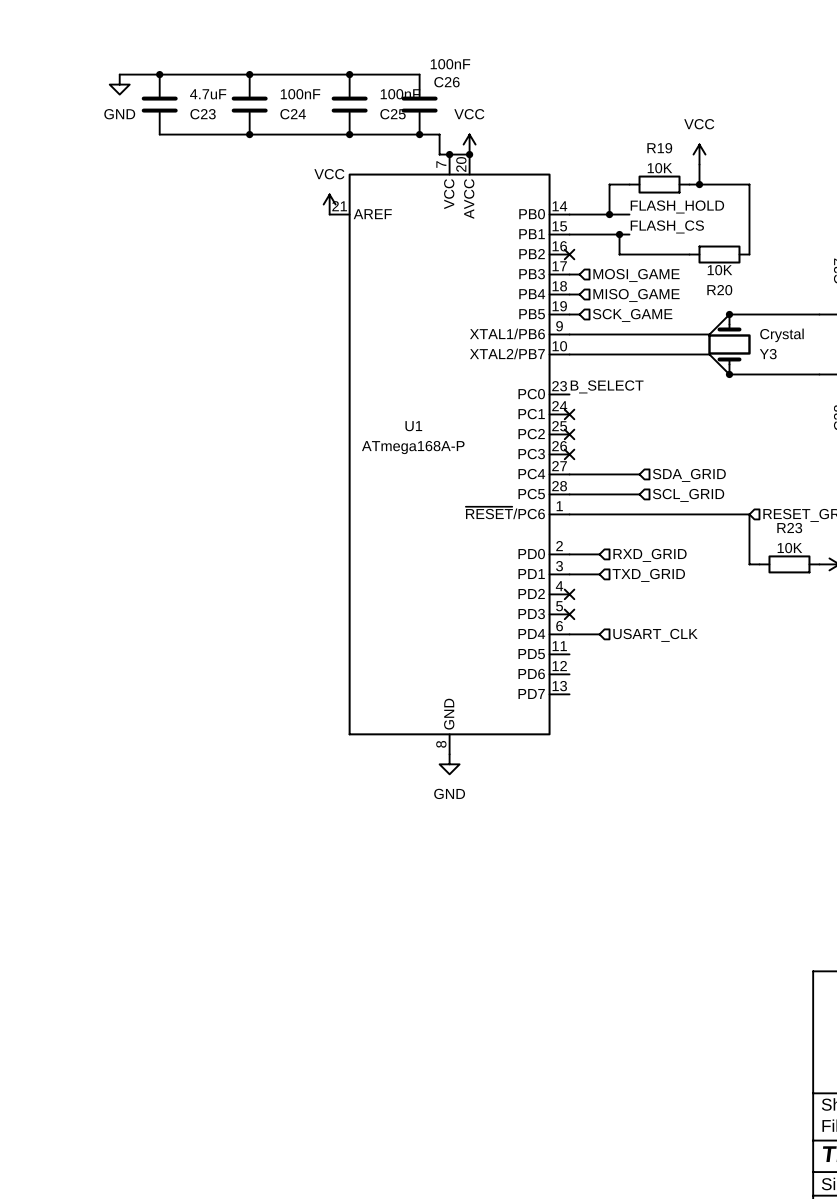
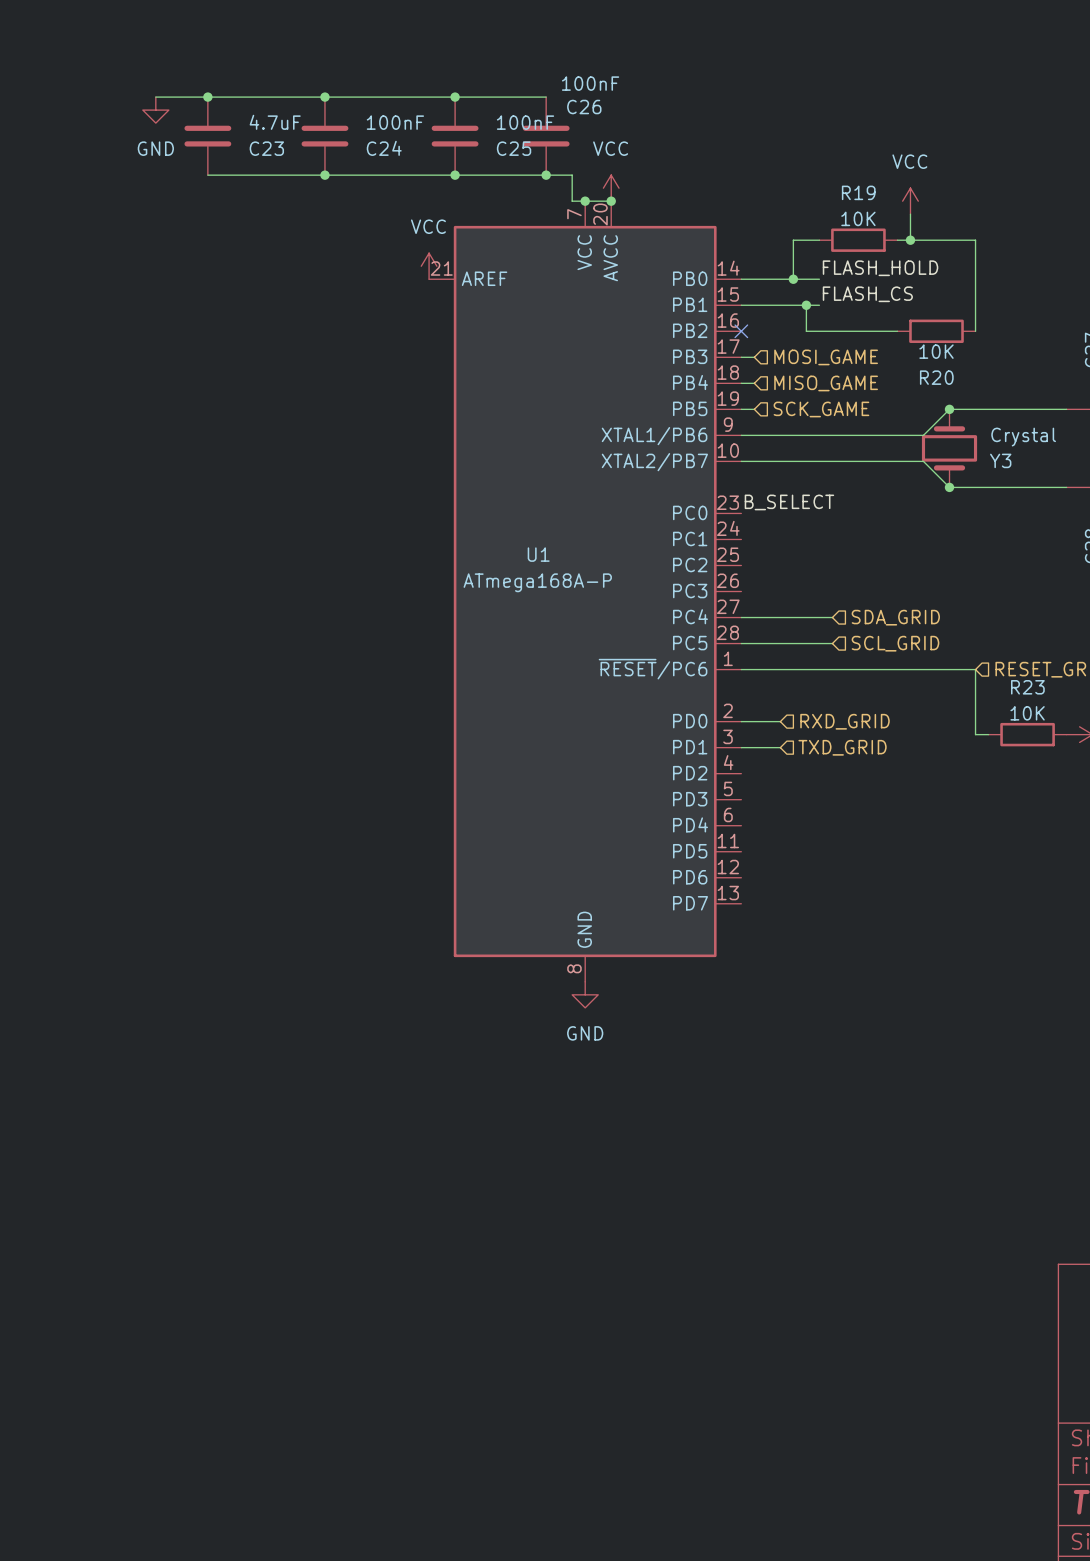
no-connect mark: (569, 414) -> none
no-connect mark: (569, 434) -> none
no-connect mark: (569, 454) -> none
no-connect mark: (569, 594) -> none
no-connect mark: (569, 614) -> none
wire: (569, 634) (599, 634) -> none
hierarchical label: USART_CLK (655, 635) -> none

